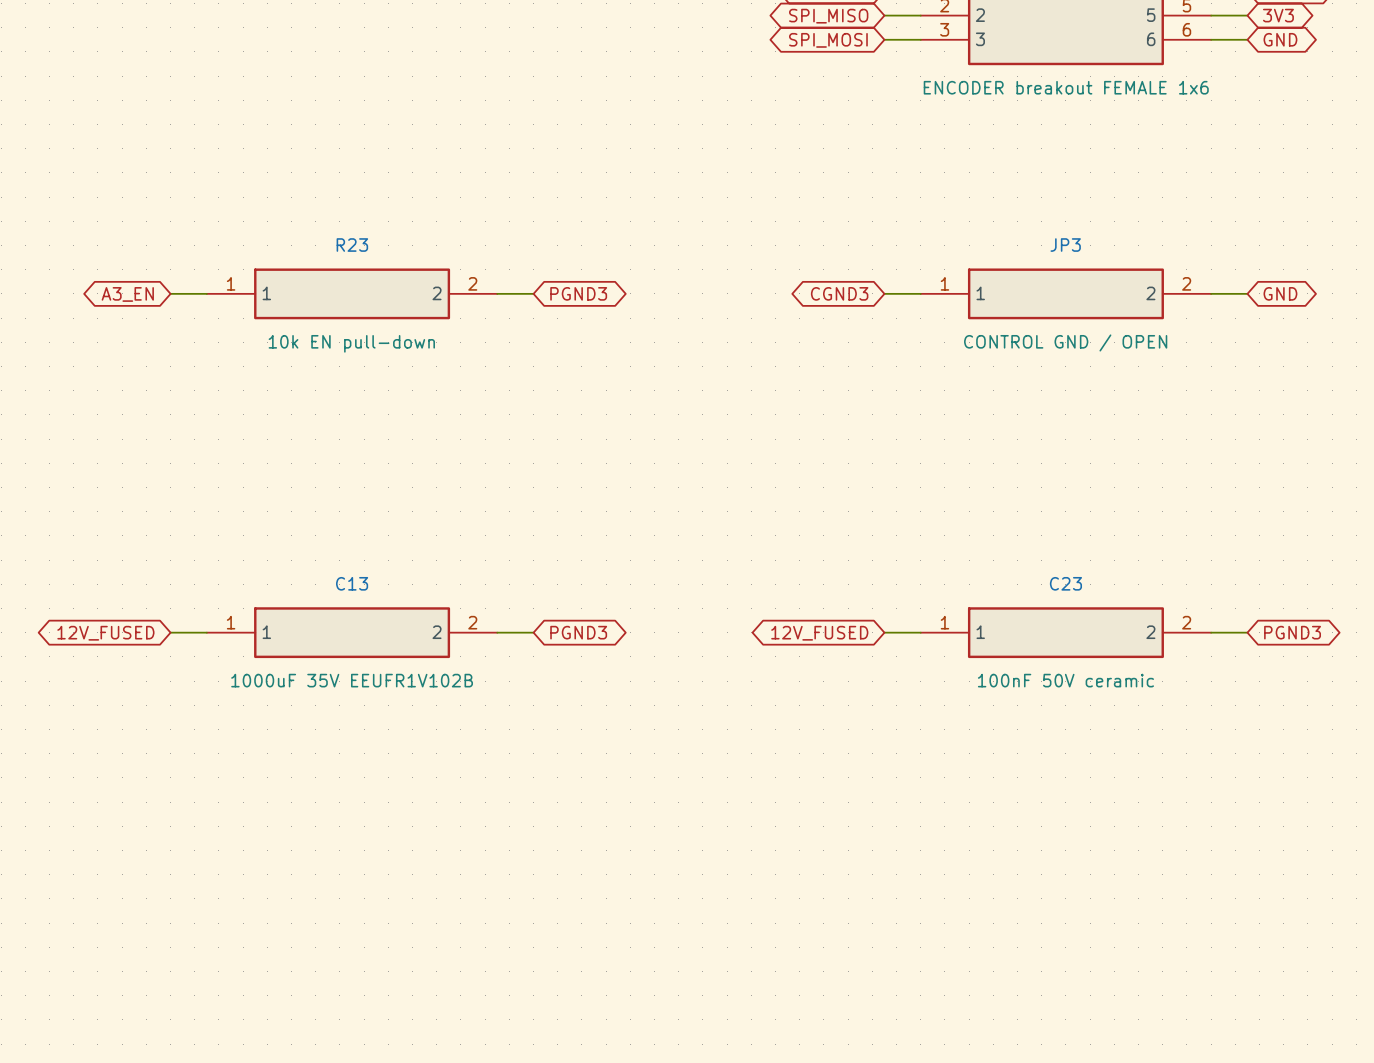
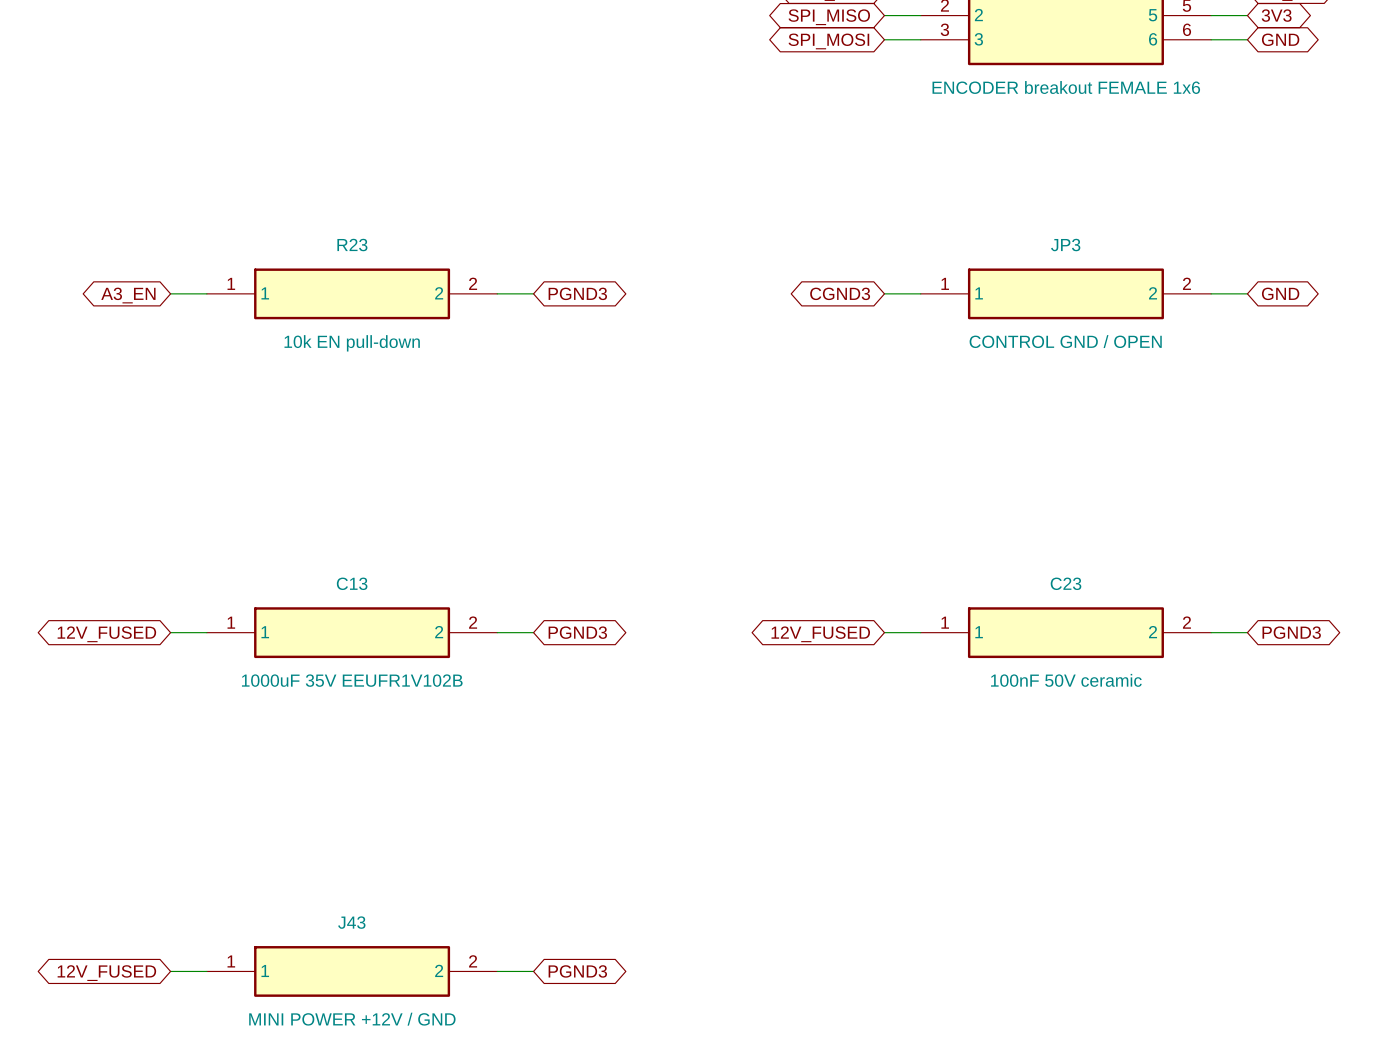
wire: none -> (170, 971) (206, 971)
J43: none -> MINI POWER +12V / GND (352, 971)
wire: none -> (497, 971) (533, 971)
global label: none -> PGND3 (577, 971)
global label: none -> 12V_FUSED (106, 973)

